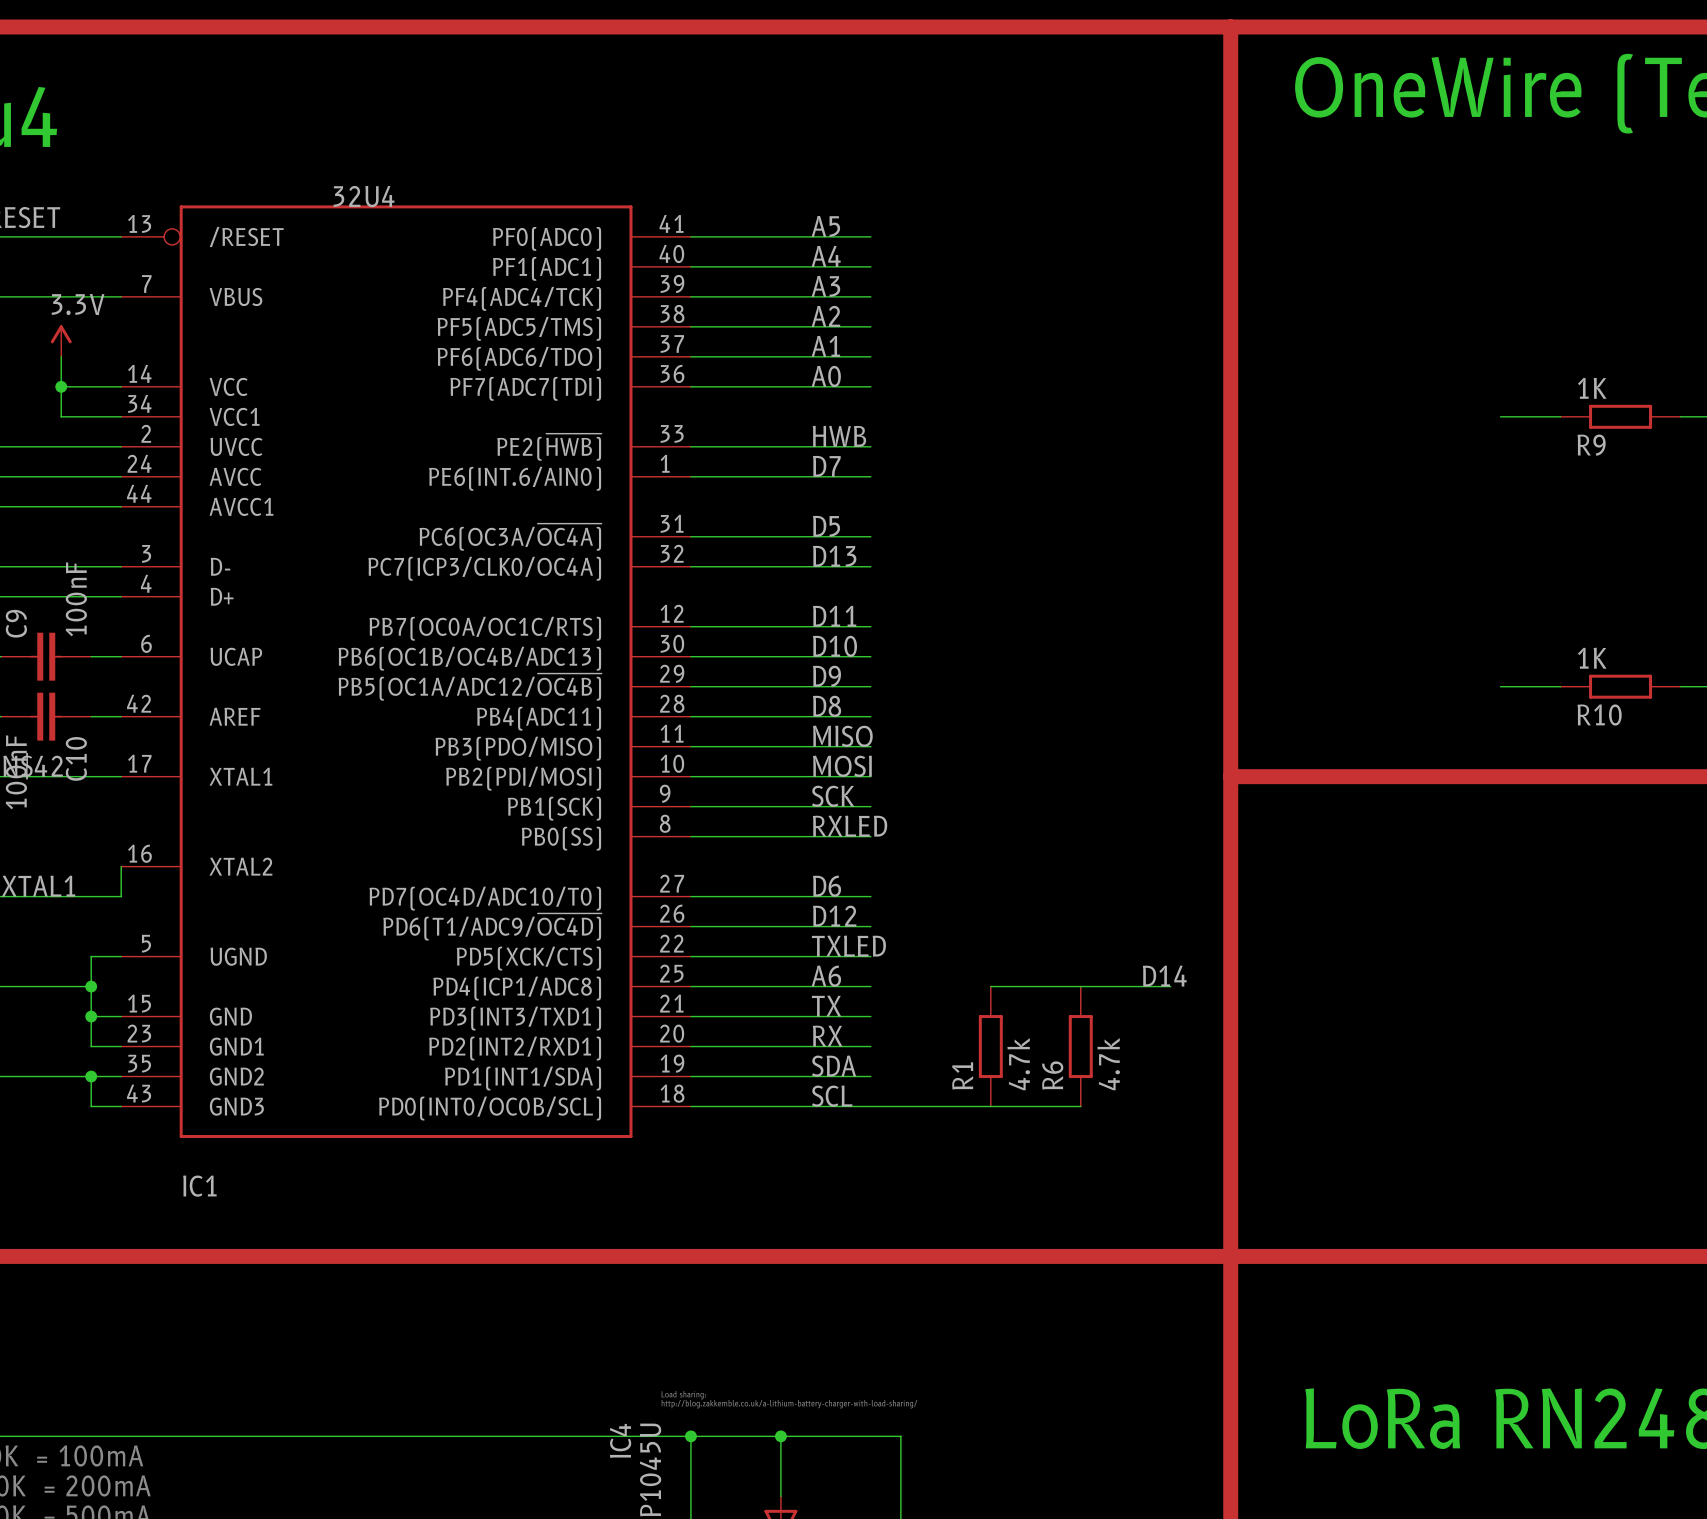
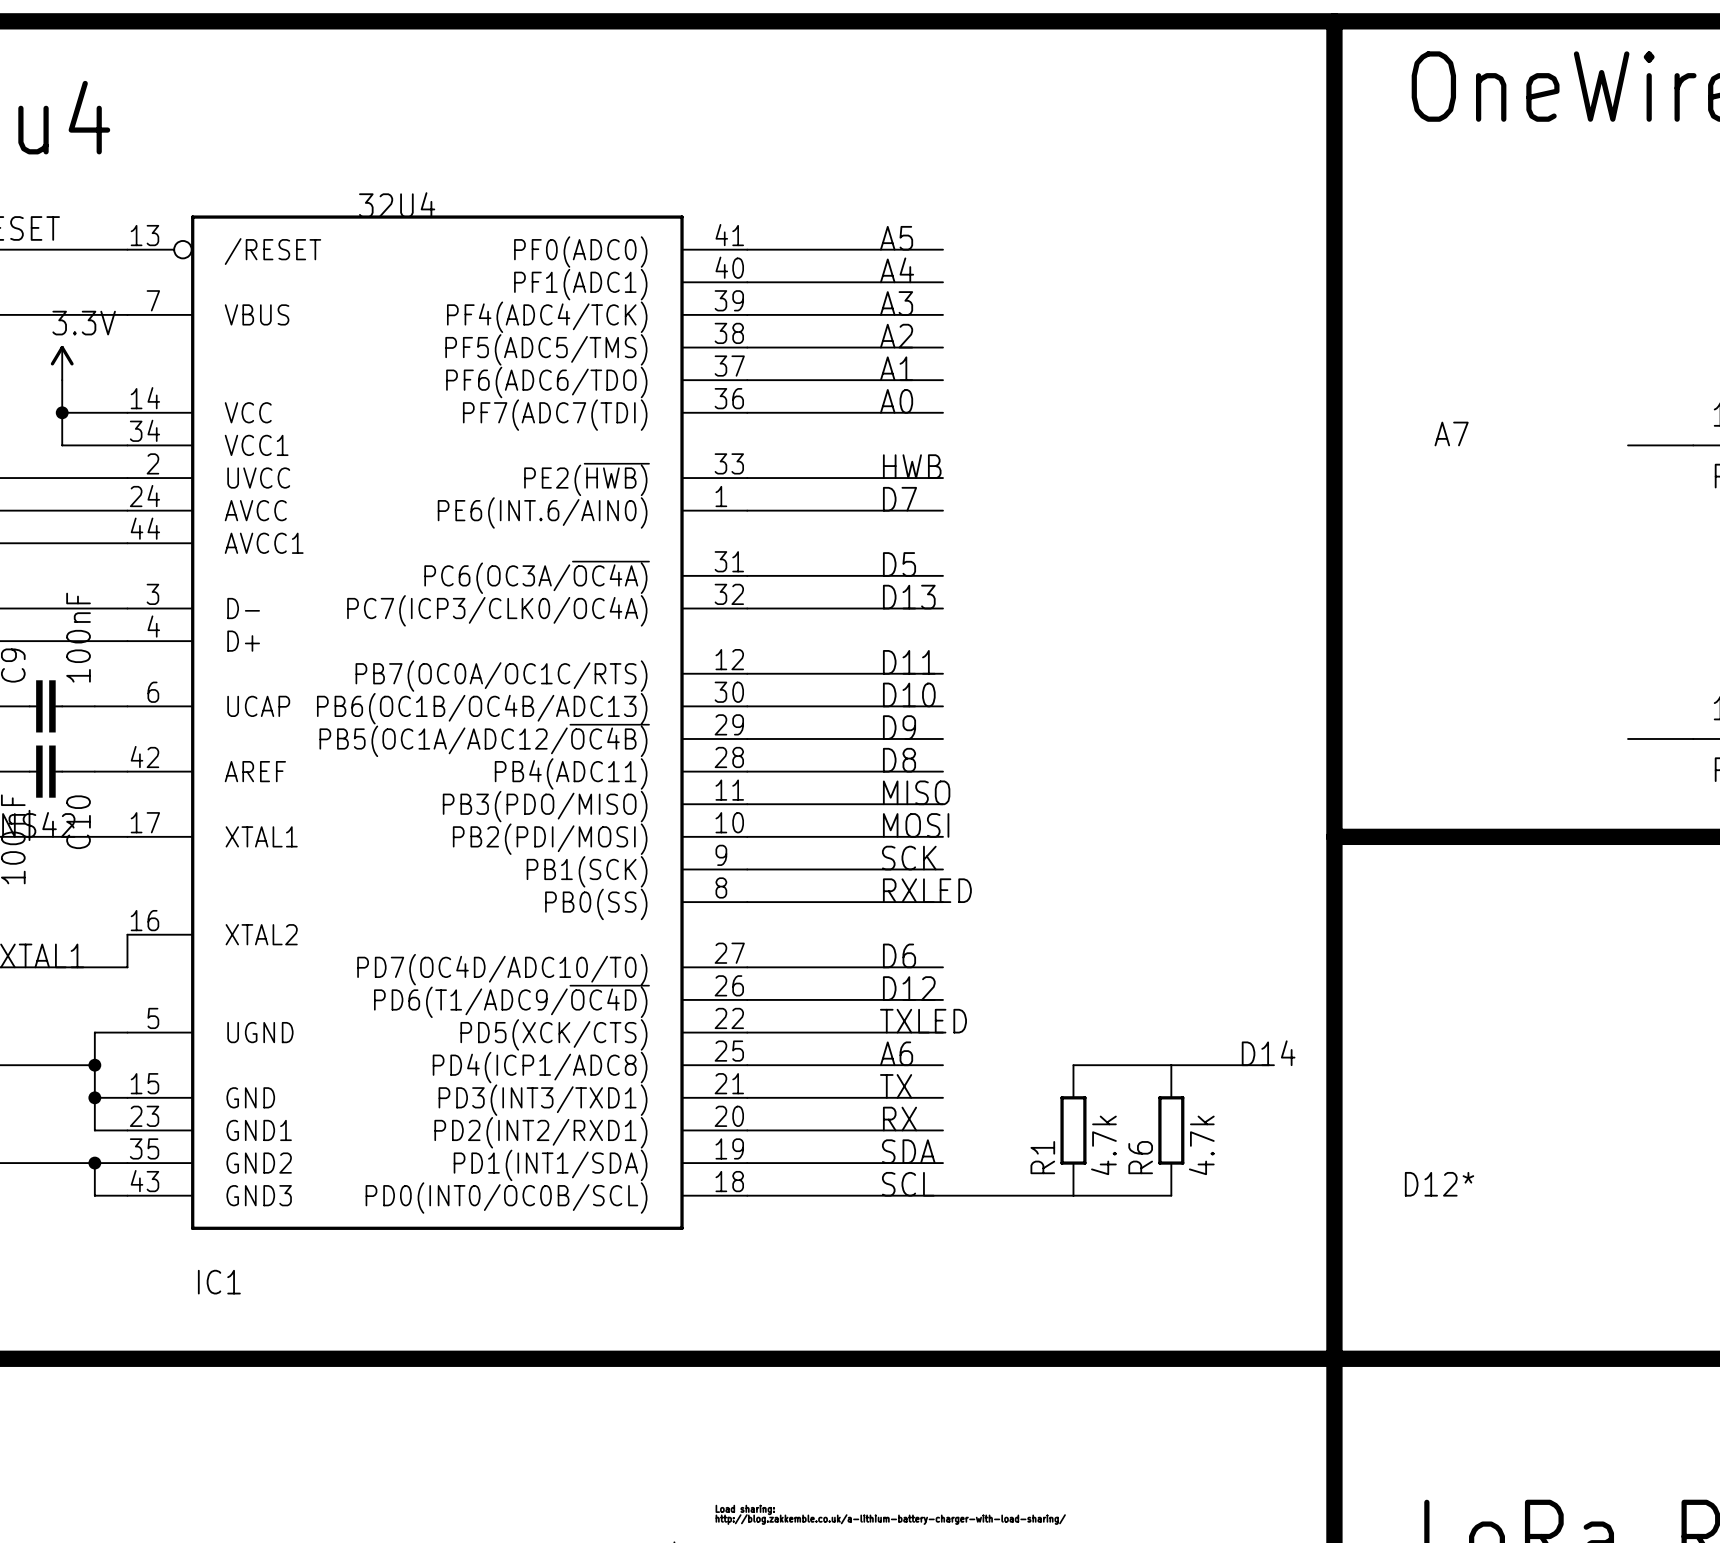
label: none -> A7 (1451, 433)
label: none -> D12* (1439, 1184)

